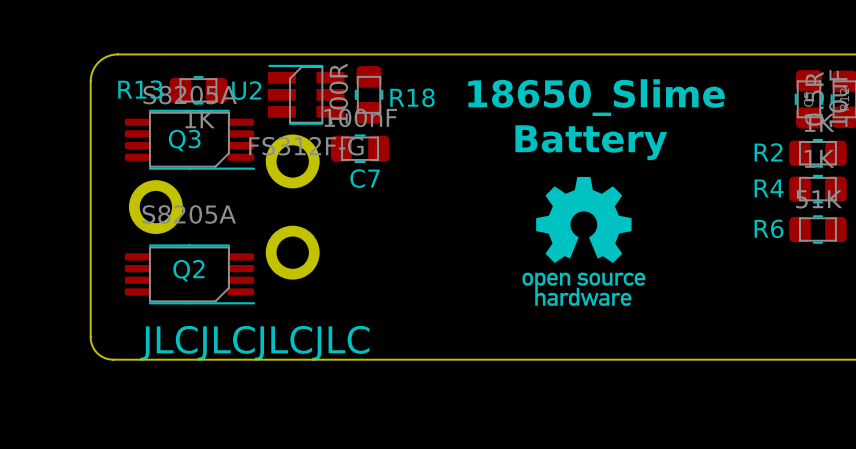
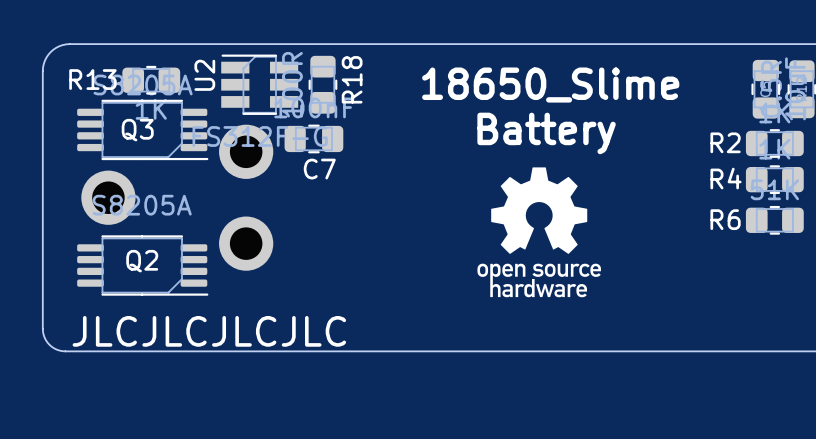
U2 name rotation: 0° (246, 90) -> 90° counterclockwise (204, 75)
R18 name rotation: 0° (412, 97) -> 90° counterclockwise (352, 79)

